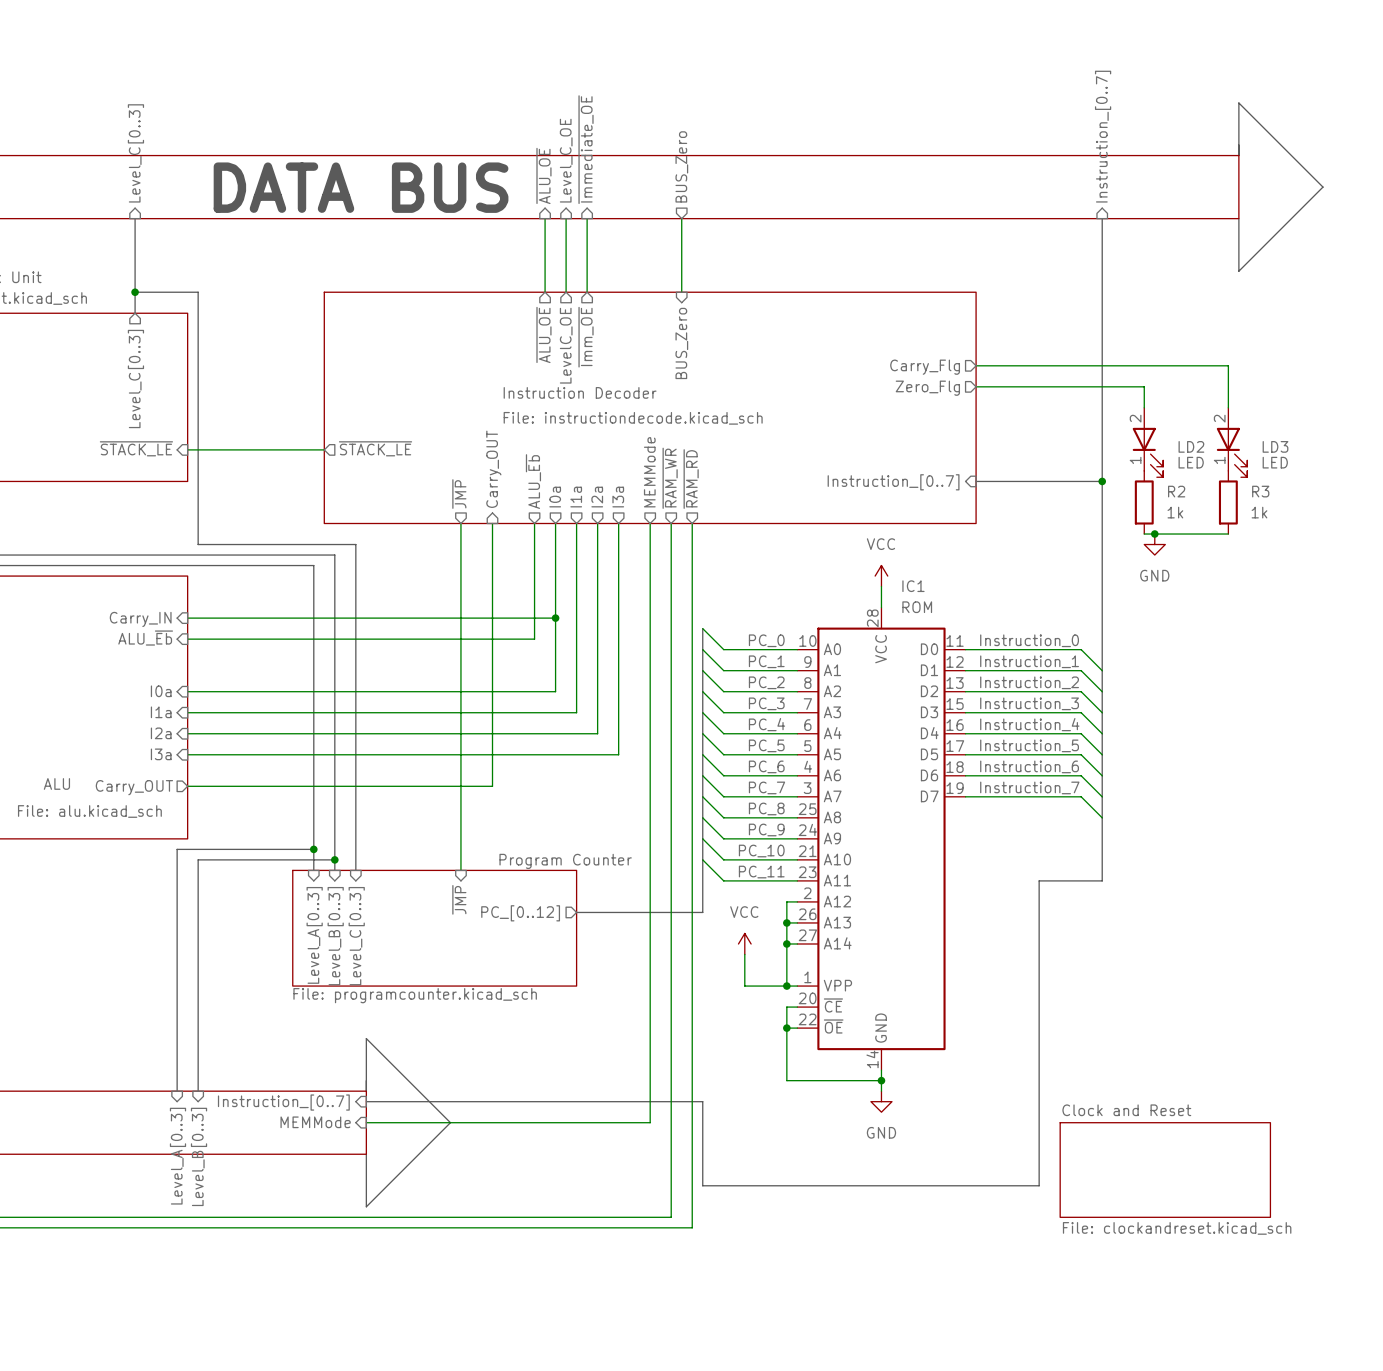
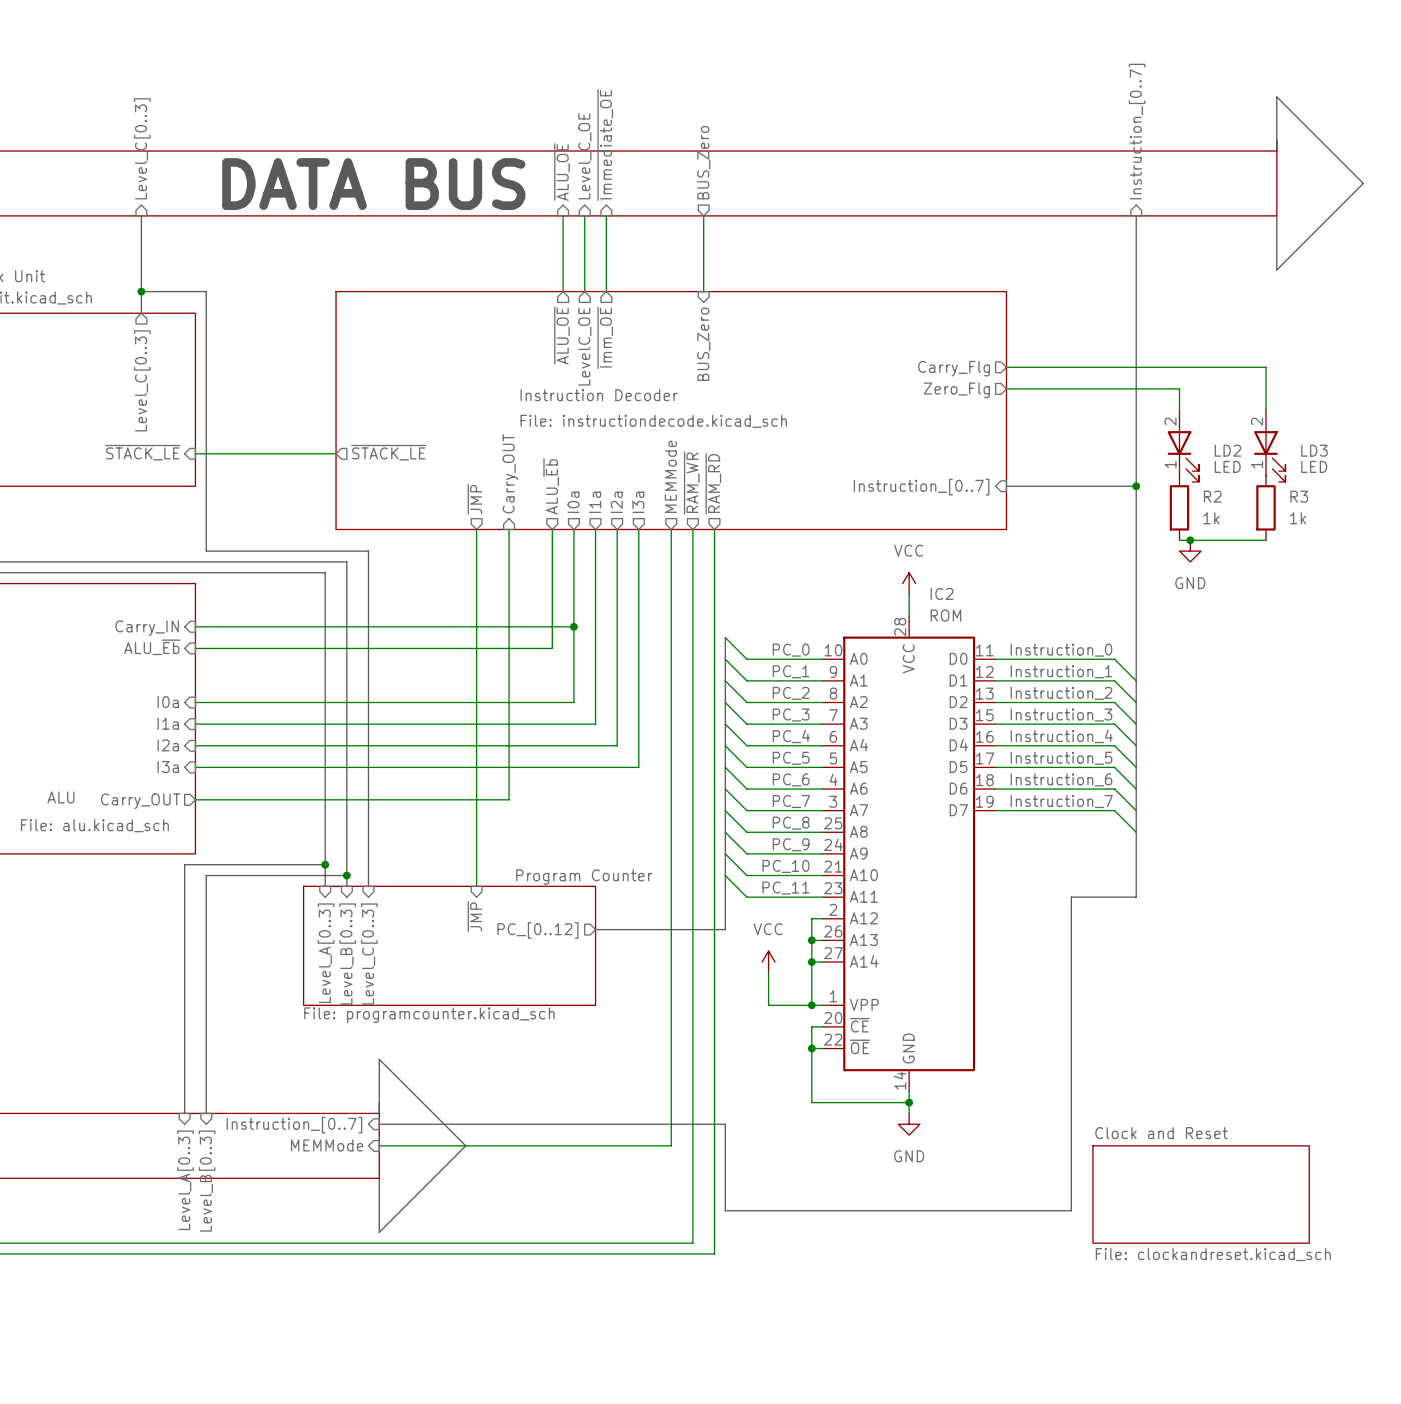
IC1 name: IC1 (913, 586) -> IC2 (942, 593)

